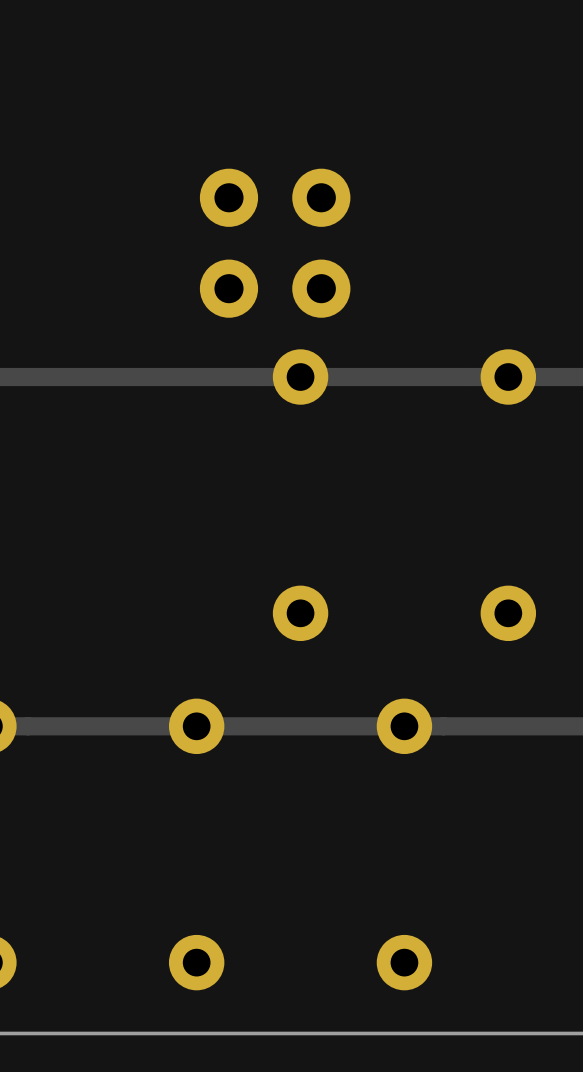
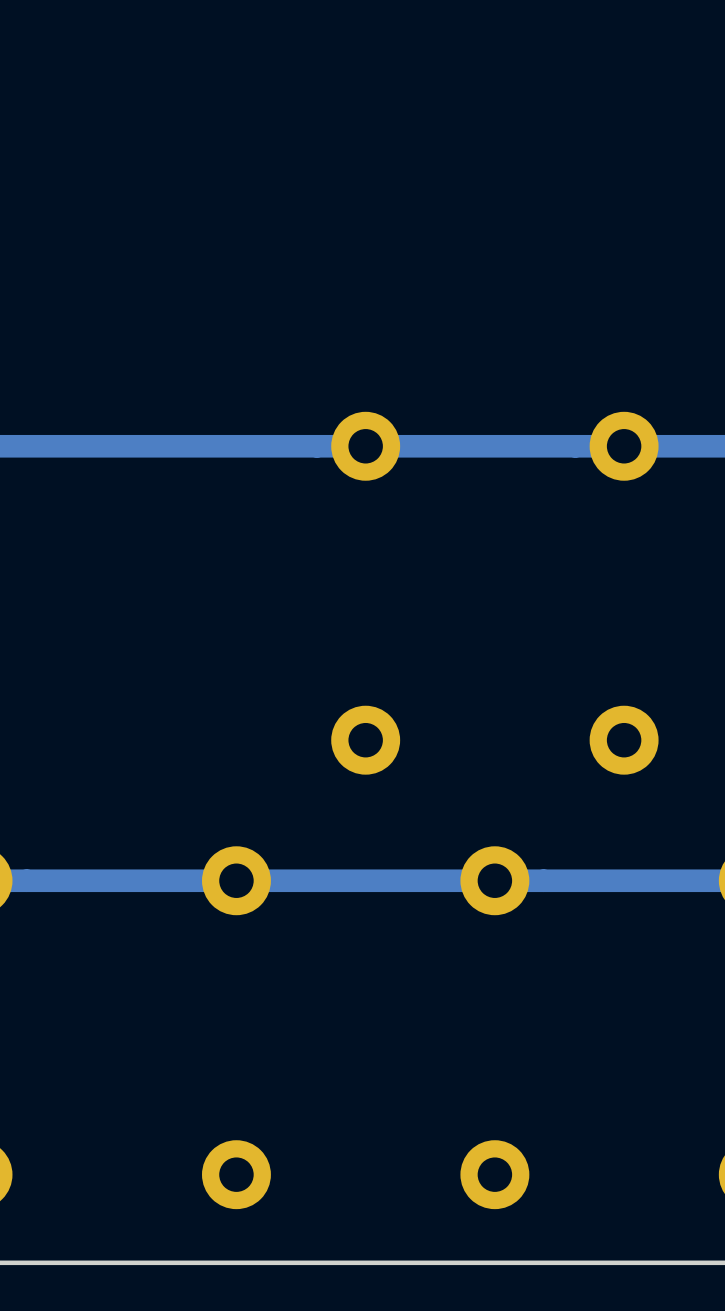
part: (228, 243) -> none
part: (321, 243) -> none

